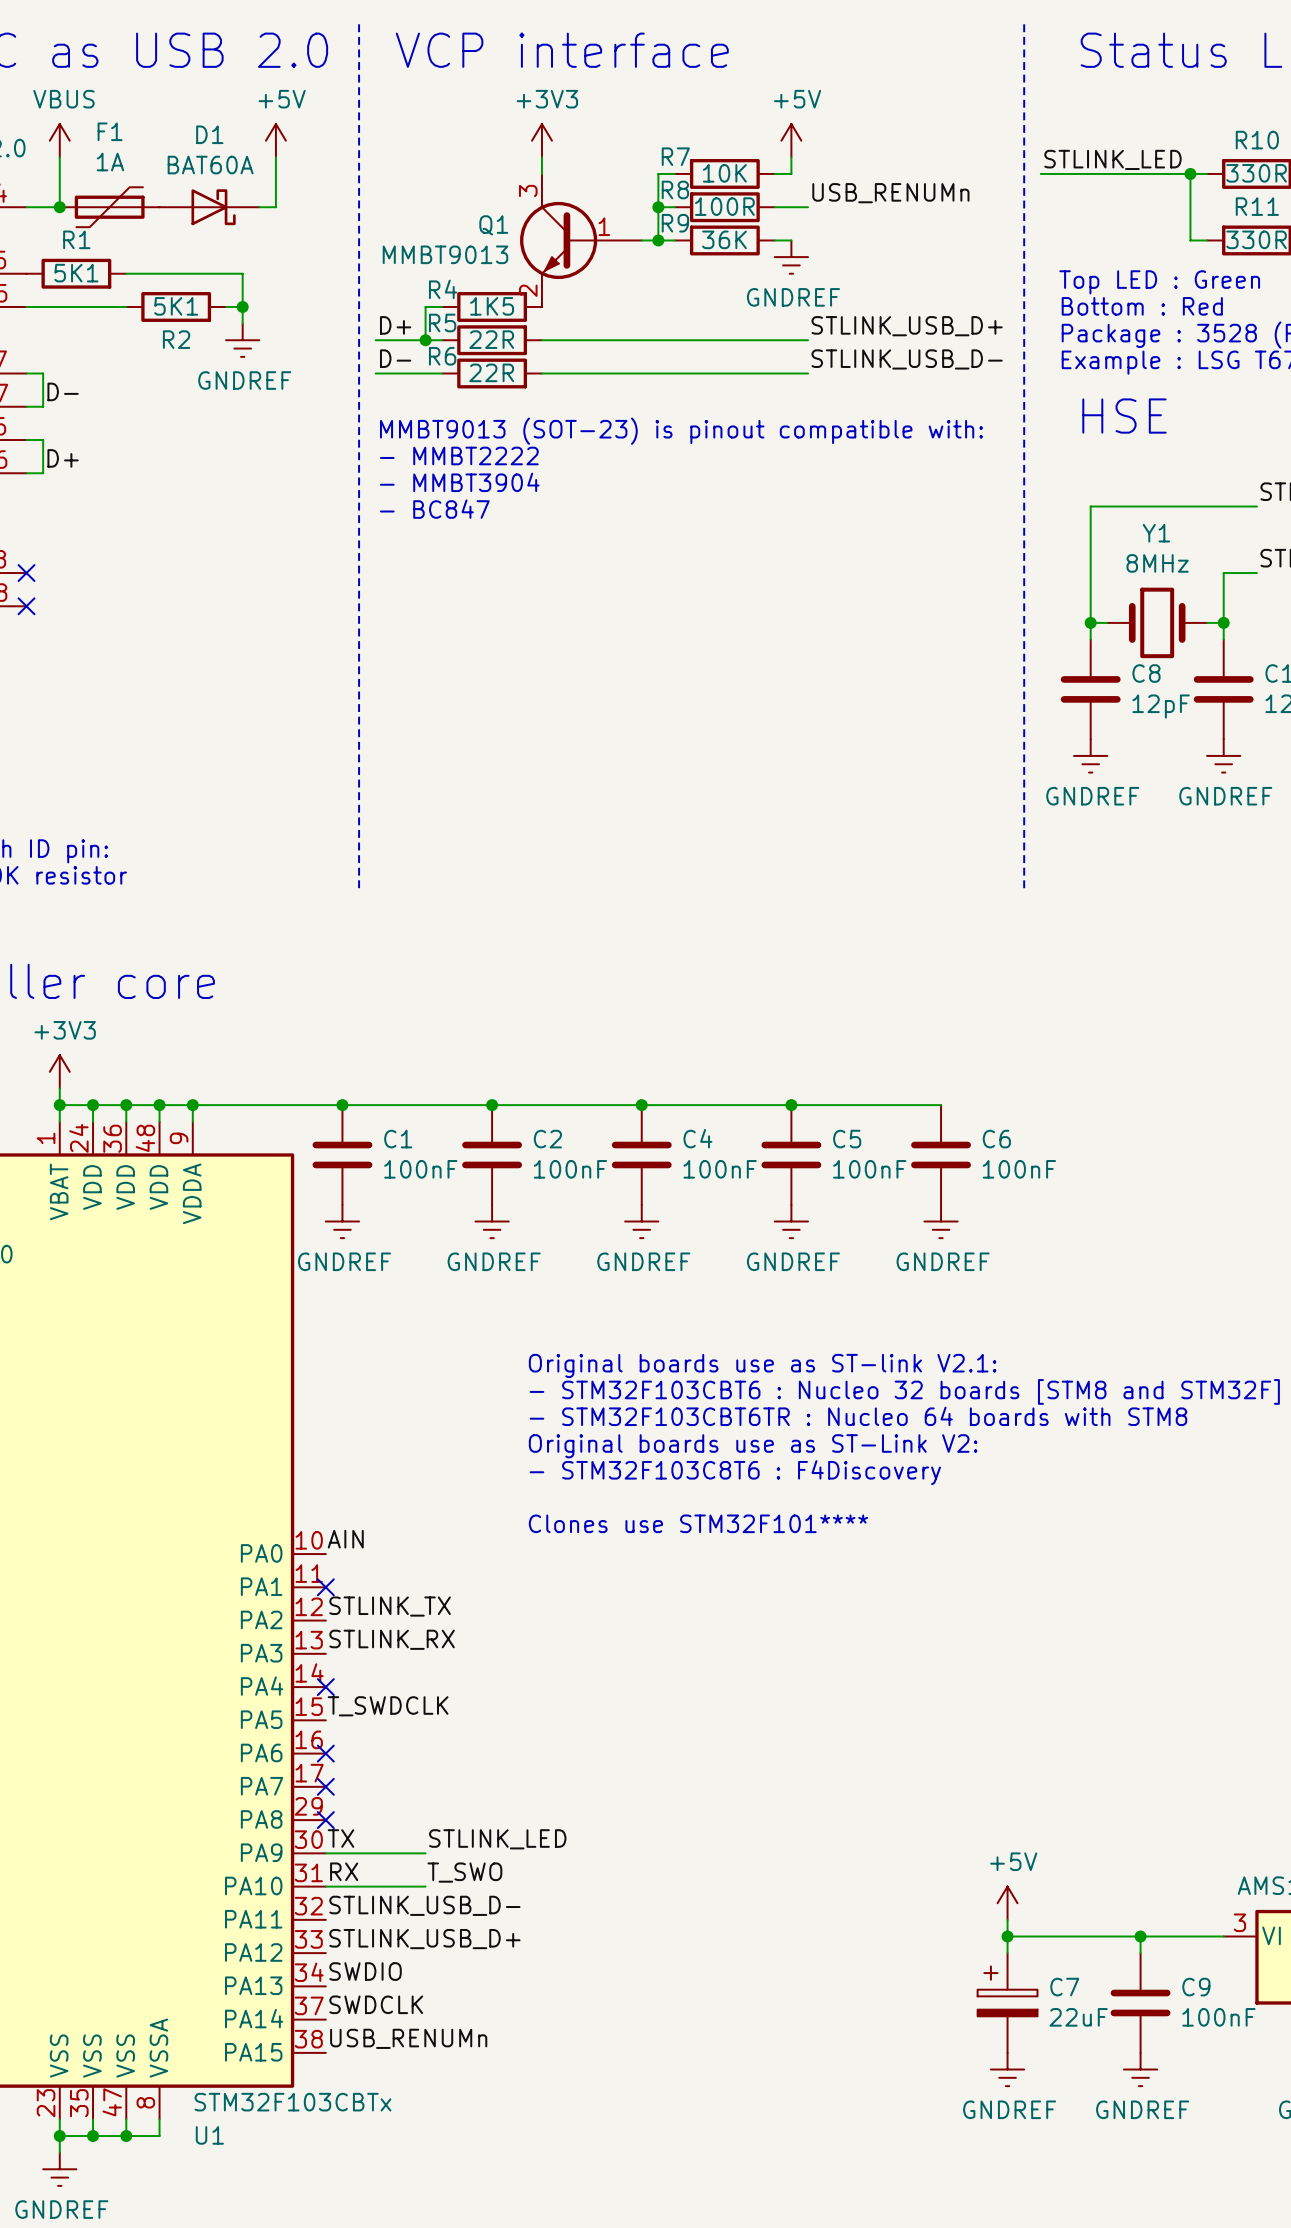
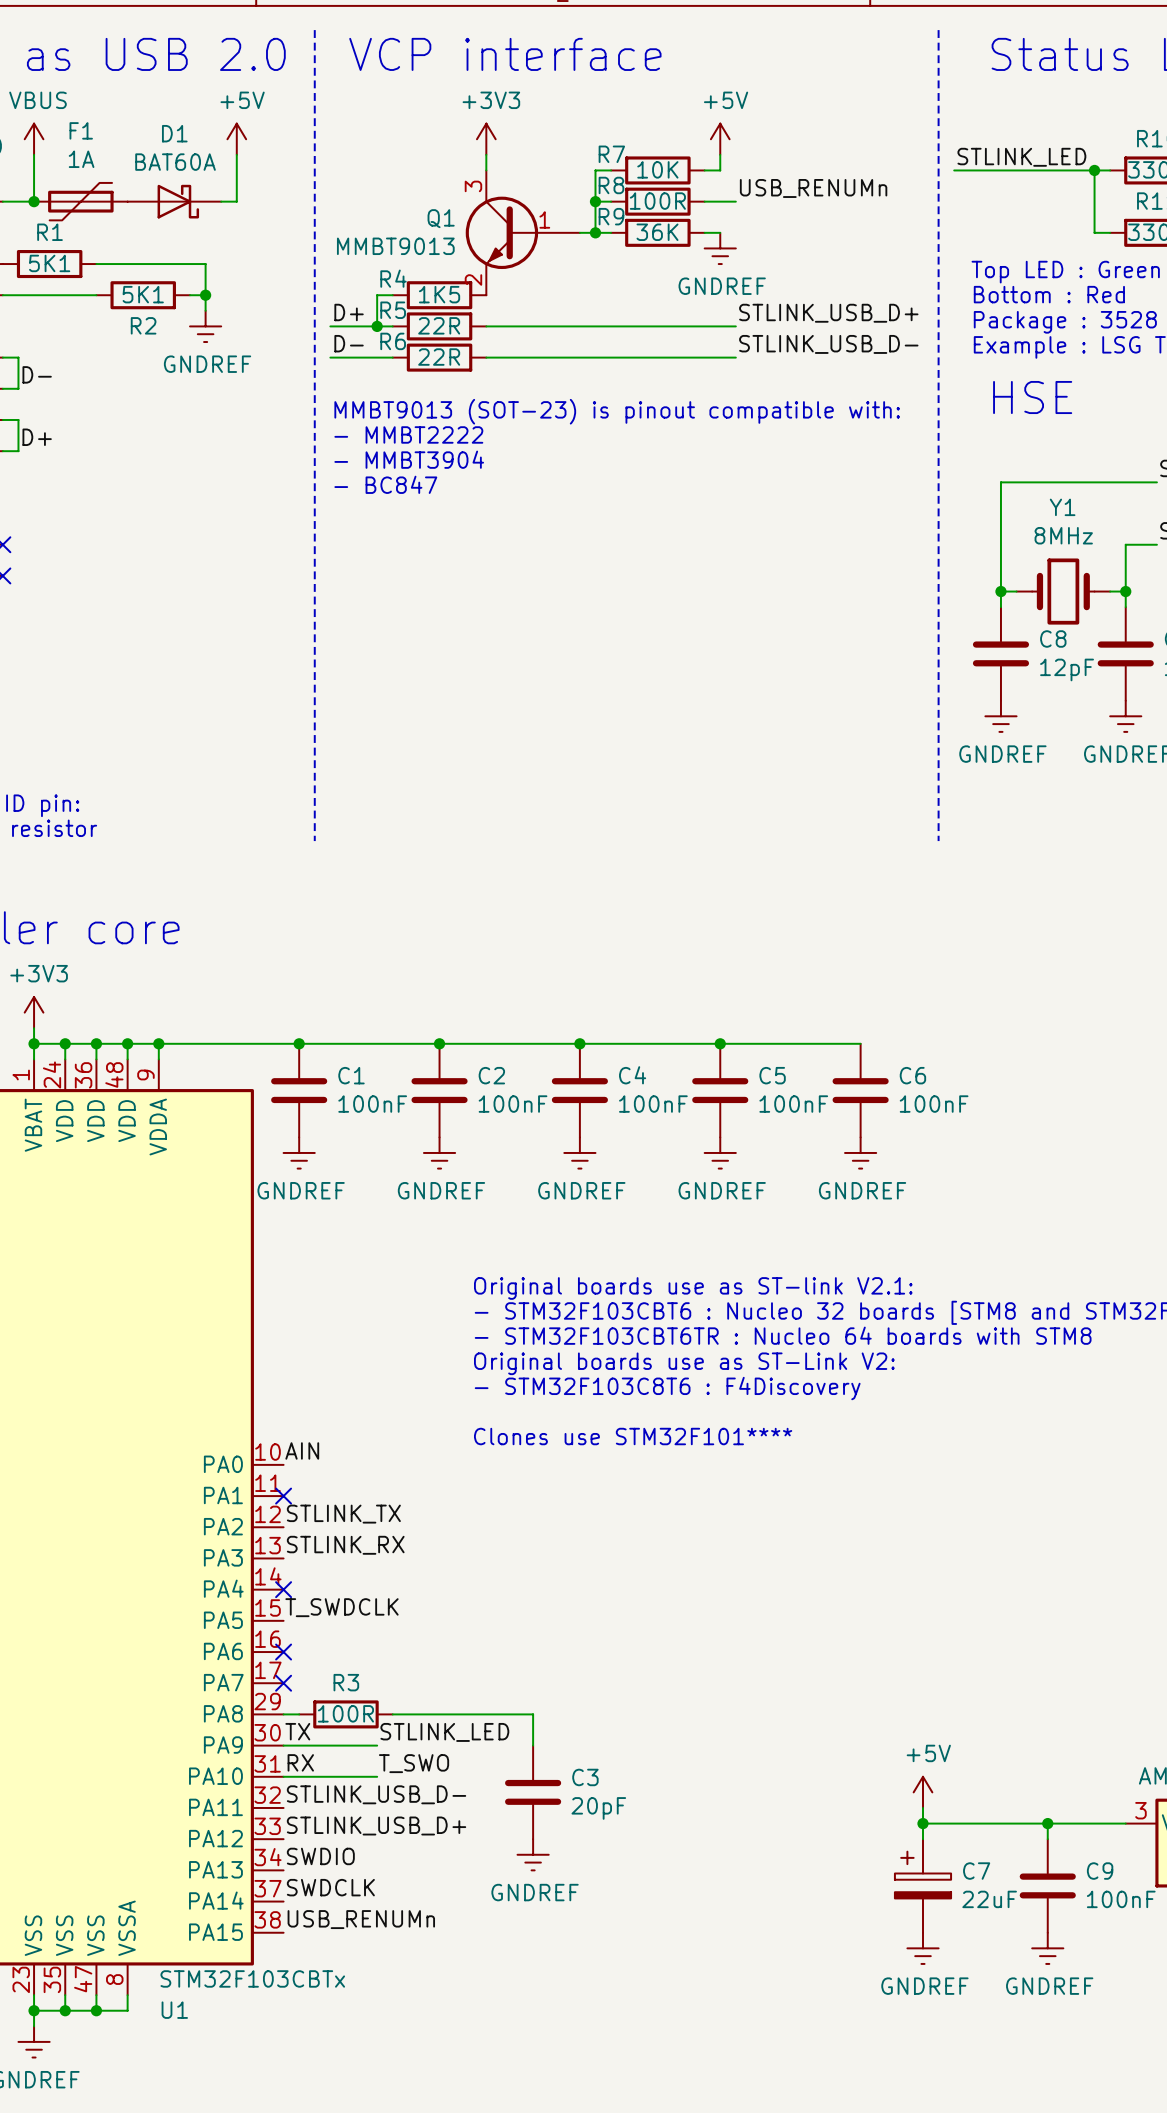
wire: none -> (283, 1714) (299, 1714)
no-connect mark: (325, 1820) -> none
R3: none -> 100R (345, 1714)
wire: none -> (392, 1714) (533, 1714) (533, 1745)
C3: none -> 20pF (533, 1792)
power symbol: none -> GNDREF (533, 1854)

